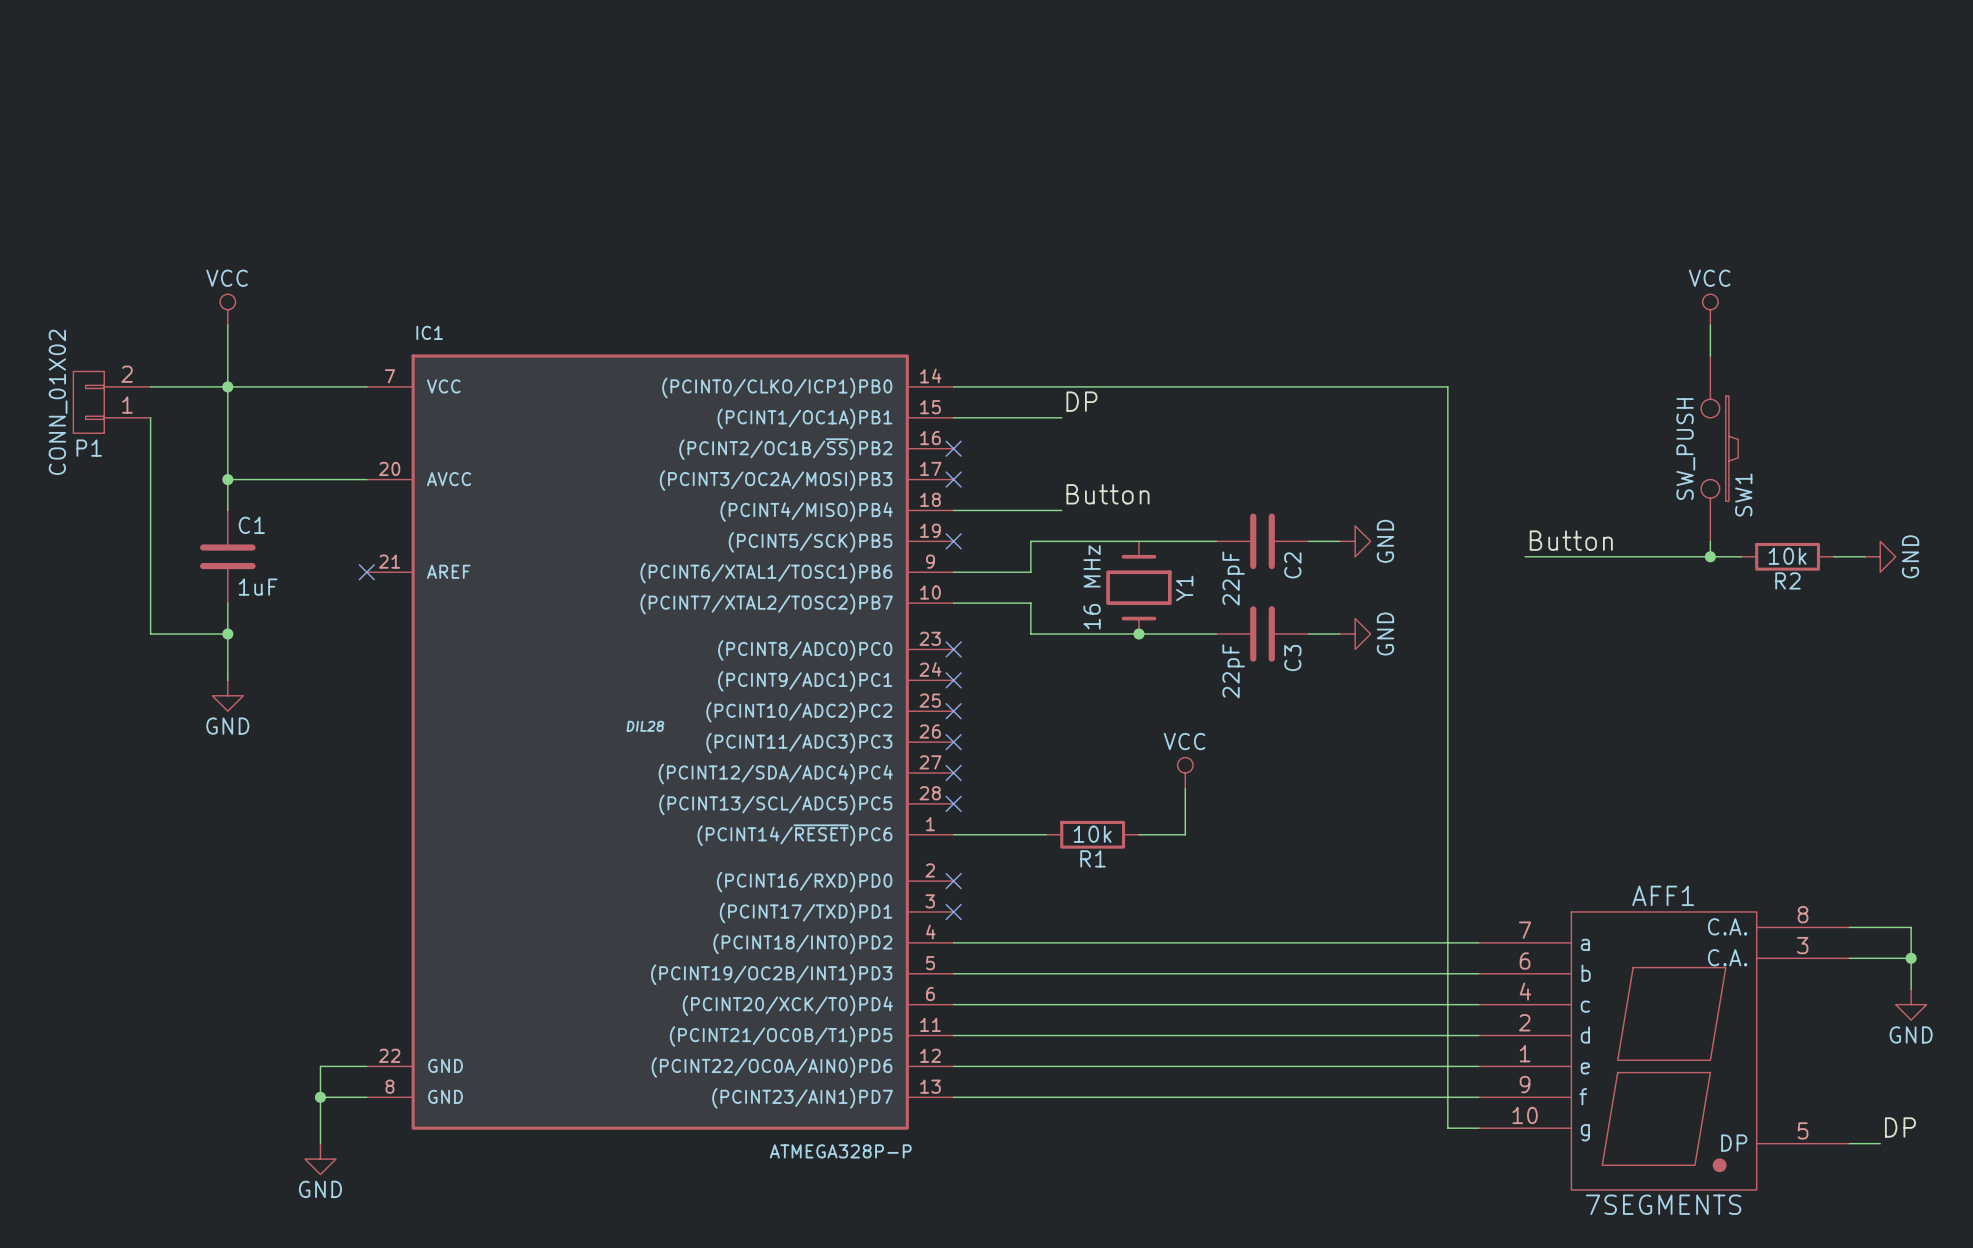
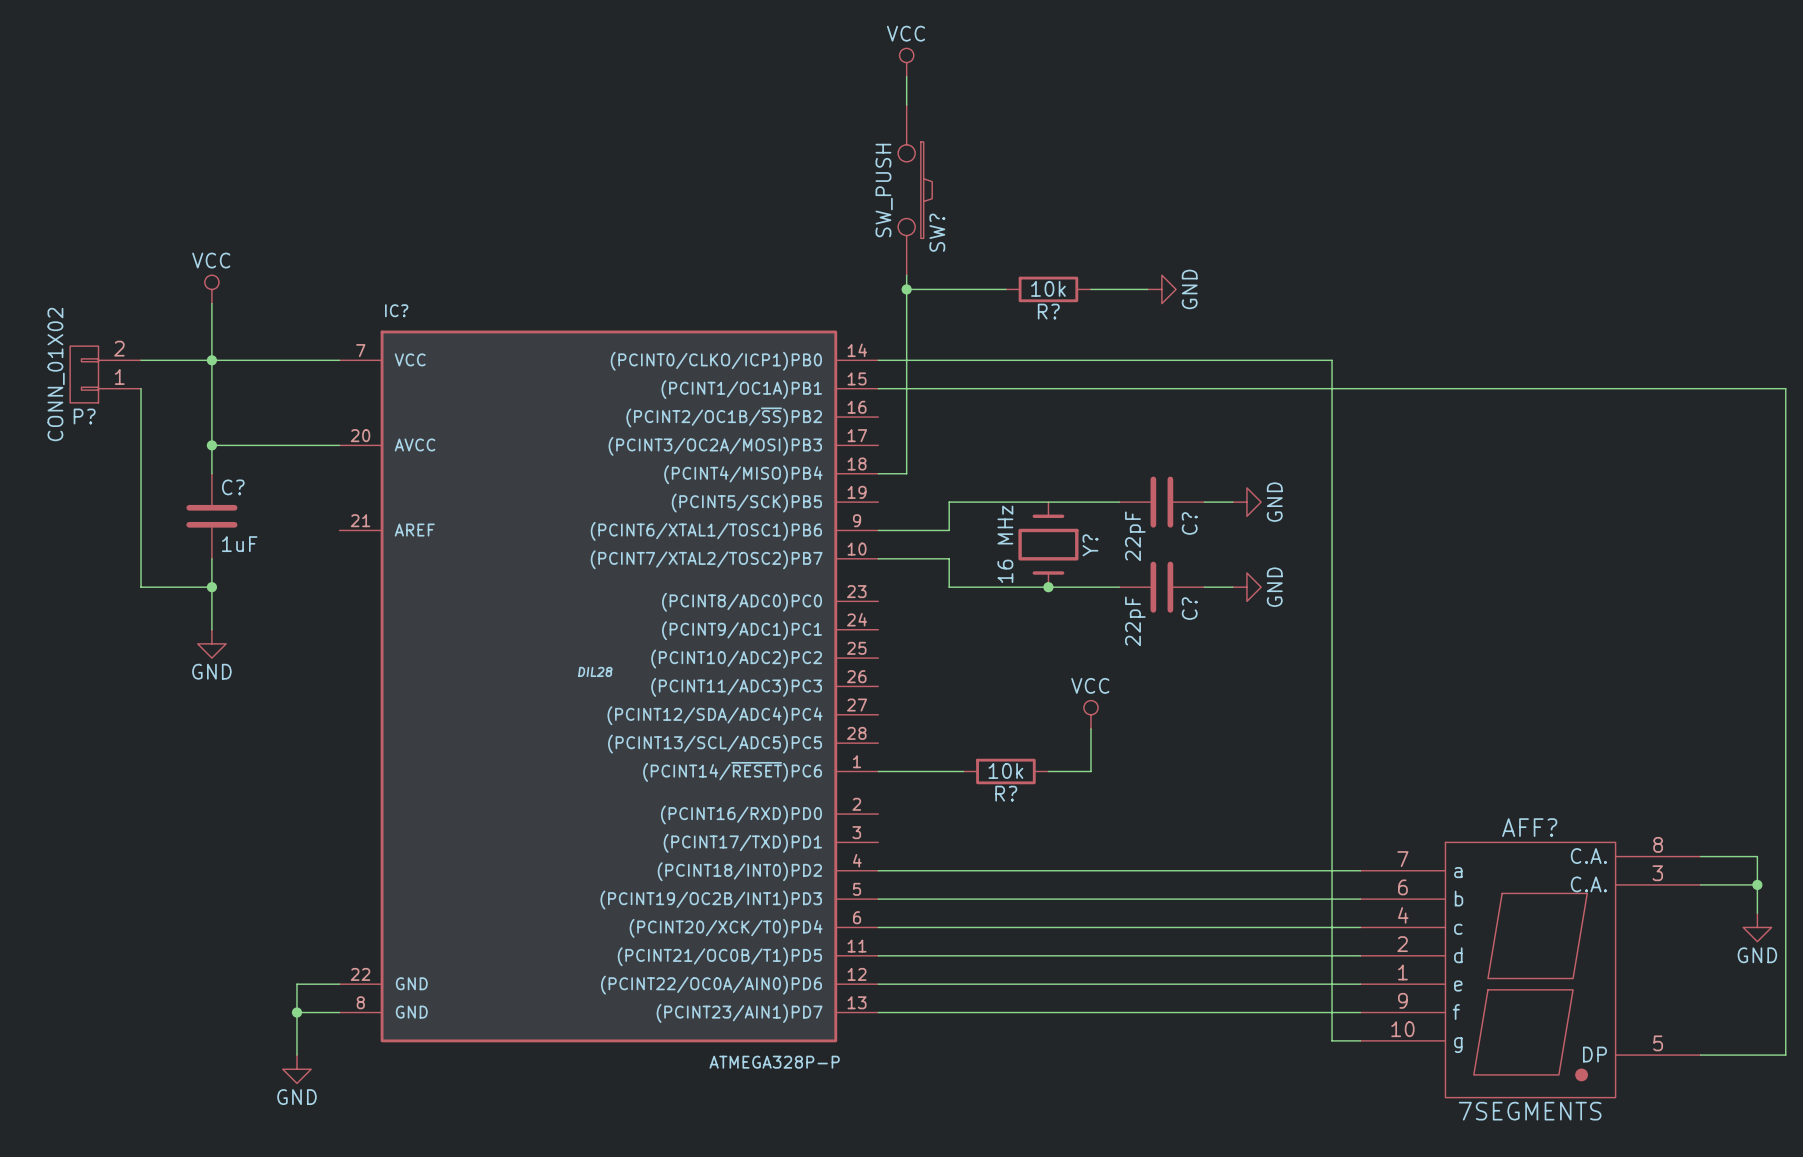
power symbol: none -> VCC (906, 62)
wire: none -> (906, 76) (906, 105)
SW?: none -> SW_PUSH (915, 190)
wire: none -> (906, 289) (1005, 289)
junction: none -> (906, 289)
R?: none -> 10k (1048, 289)
wire: none -> (1090, 289) (1147, 289)
power symbol: none -> GND (1161, 289)
power symbol: VCC (1710, 309) -> none
wire: (1710, 325) (1710, 356) -> none
IC1 name: IC1 (429, 332) -> IC? (396, 310)
label: DP (1081, 401) -> none
wire: none -> (977, 388) (1785, 388) (1785, 1055) (1729, 1055)
P1 name: P1 (89, 448) -> P? (84, 416)
no-connect mark: (953, 448) -> none
SW1: SW_PUSH (1719, 448) -> none
no-connect mark: (953, 479) -> none
label: Button (1107, 494) -> none
wire: (984, 510) (1061, 510) -> (906, 473) (906, 275)
C1 name: C1 (251, 525) -> C? (233, 487)
label: Button (1571, 540) -> none
no-connect mark: (953, 541) -> none
wire: (1710, 541) (1710, 556) -> none
wire: (1525, 556) (1741, 556) -> none
junction: (1710, 556) -> none
R2: 10k (1787, 556) -> none
wire: (1833, 556) (1864, 556) -> none
power symbol: GND (1880, 556) -> none
C2 name: C2 (1292, 565) -> C? (1189, 523)
no-connect mark: (366, 572) -> none
Y1 name: Y1 (1184, 588) -> Y? (1090, 545)
no-connect mark: (953, 649) -> none
C3 name: C3 (1292, 658) -> C? (1189, 608)
no-connect mark: (953, 680) -> none
no-connect mark: (953, 711) -> none
no-connect mark: (953, 742) -> none
no-connect mark: (953, 773) -> none
no-connect mark: (953, 803) -> none
R1 name: R1 (1093, 858) -> R? (1006, 793)
no-connect mark: (953, 881) -> none
AFF1 name: AFF1 (1663, 895) -> AFF? (1529, 827)
no-connect mark: (953, 911) -> none
label: DP (1900, 1127) -> none

